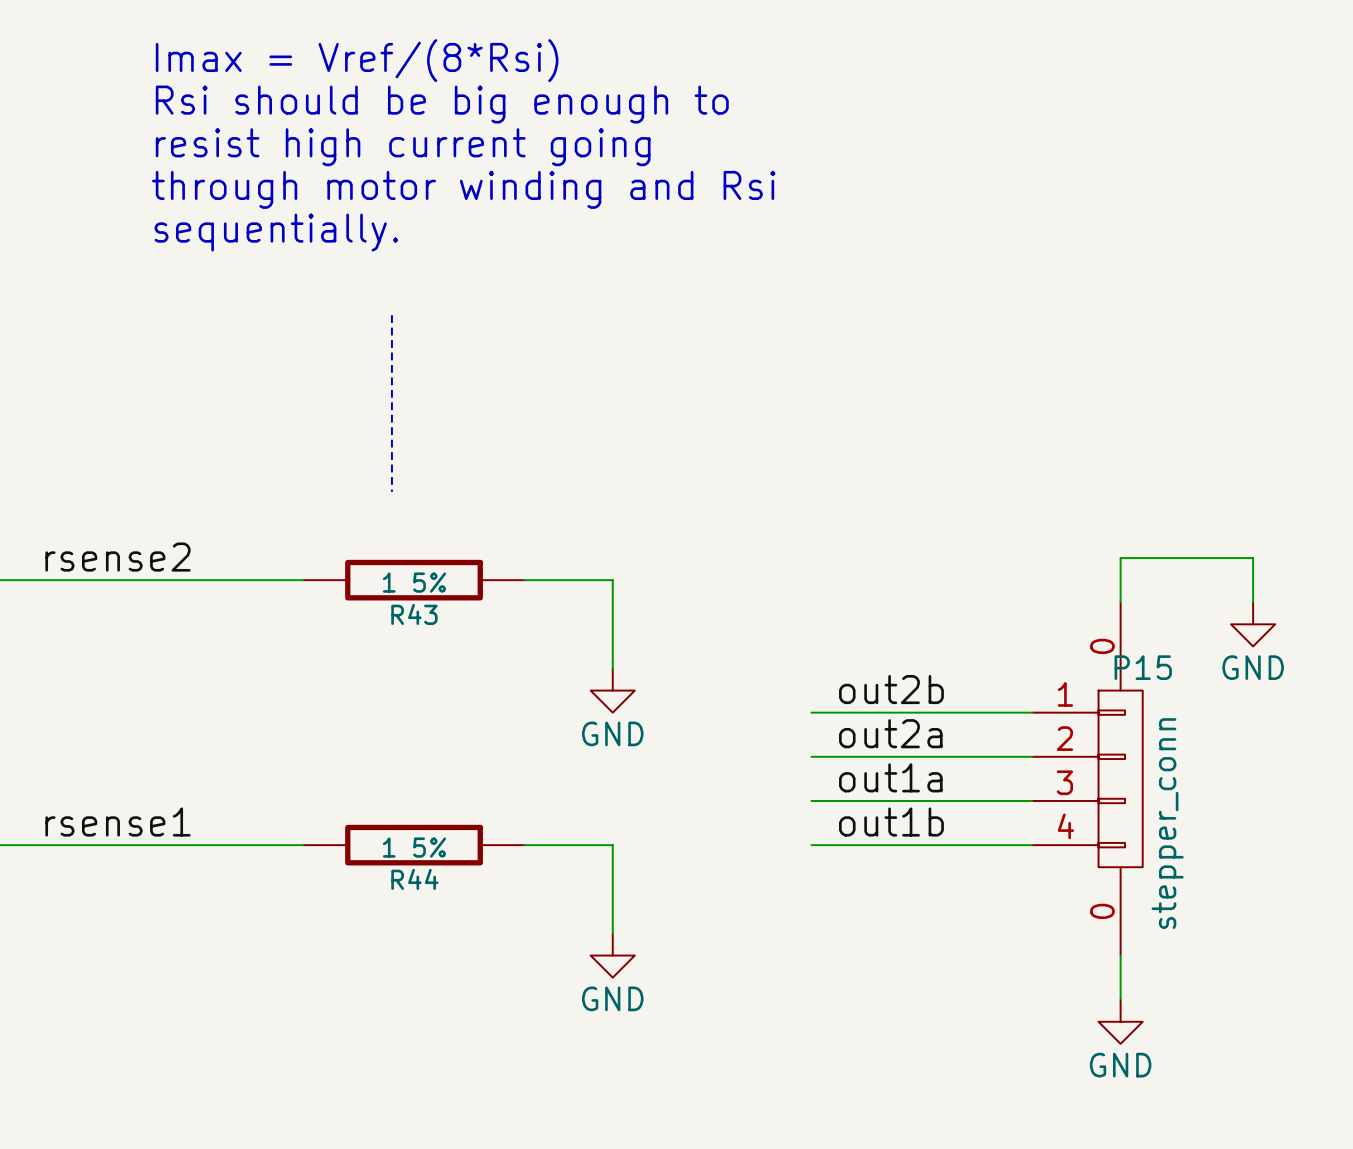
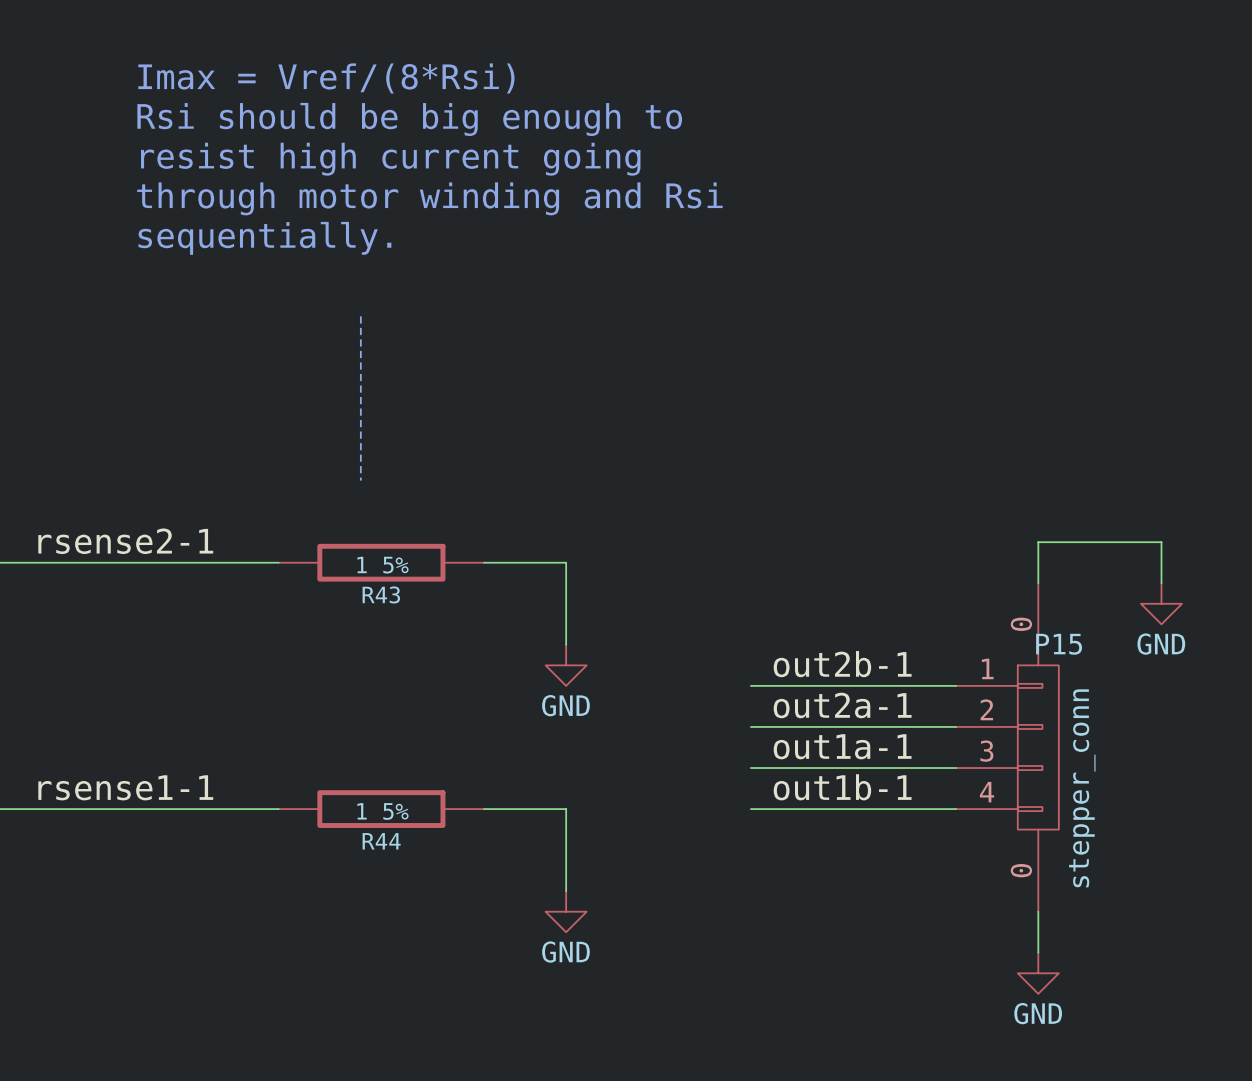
label: rsense2 (117, 557) -> rsense2-1 (125, 541)
label: out2b (891, 689) -> out2b-1 (842, 664)
label: out2a (890, 733) -> out2a-1 (842, 705)
label: out1a (890, 777) -> out1a-1 (842, 746)
label: rsense1 (117, 822) -> rsense1-1 (125, 787)
label: out1b (891, 822) -> out1b-1 (842, 787)

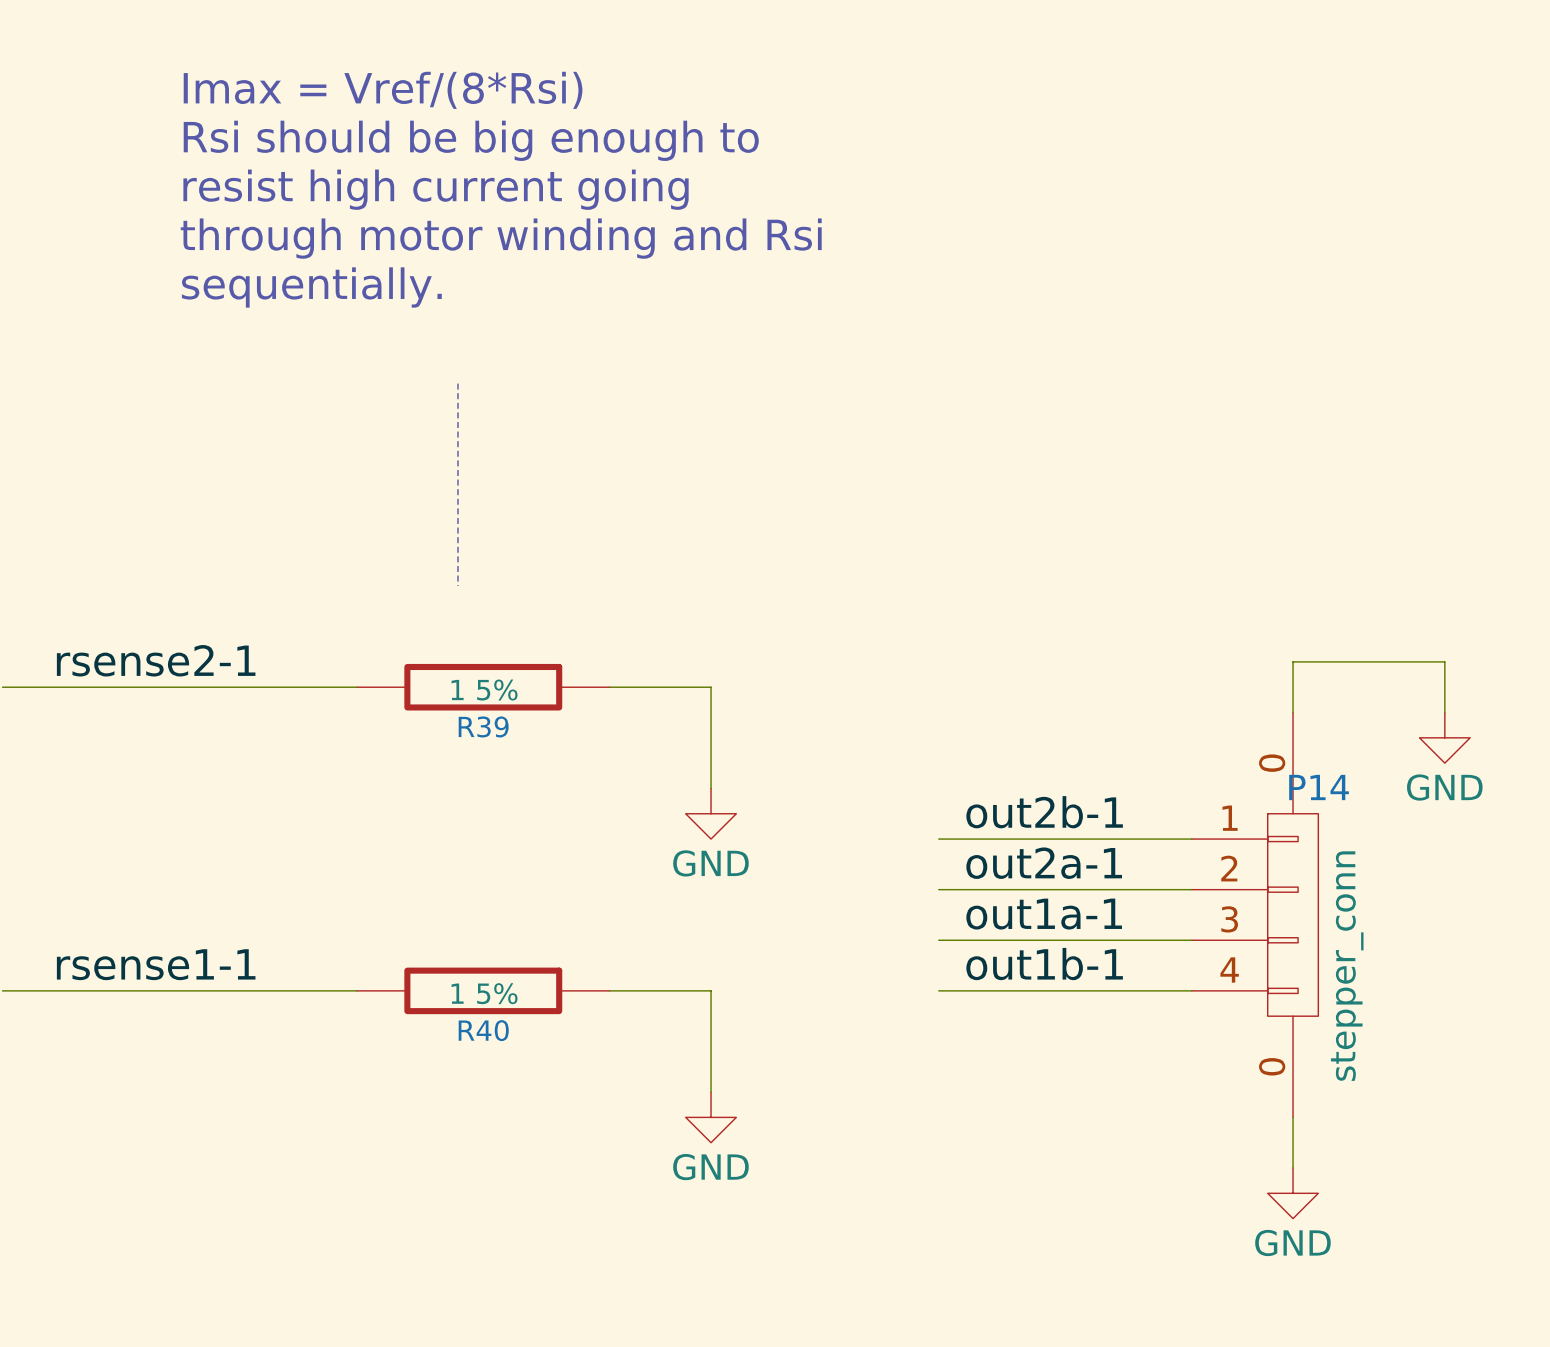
R43 name: R43 (381, 594) -> R39 (483, 726)
P15 name: P15 (1059, 644) -> P14 (1319, 787)
R44 name: R44 (381, 841) -> R40 (483, 1030)

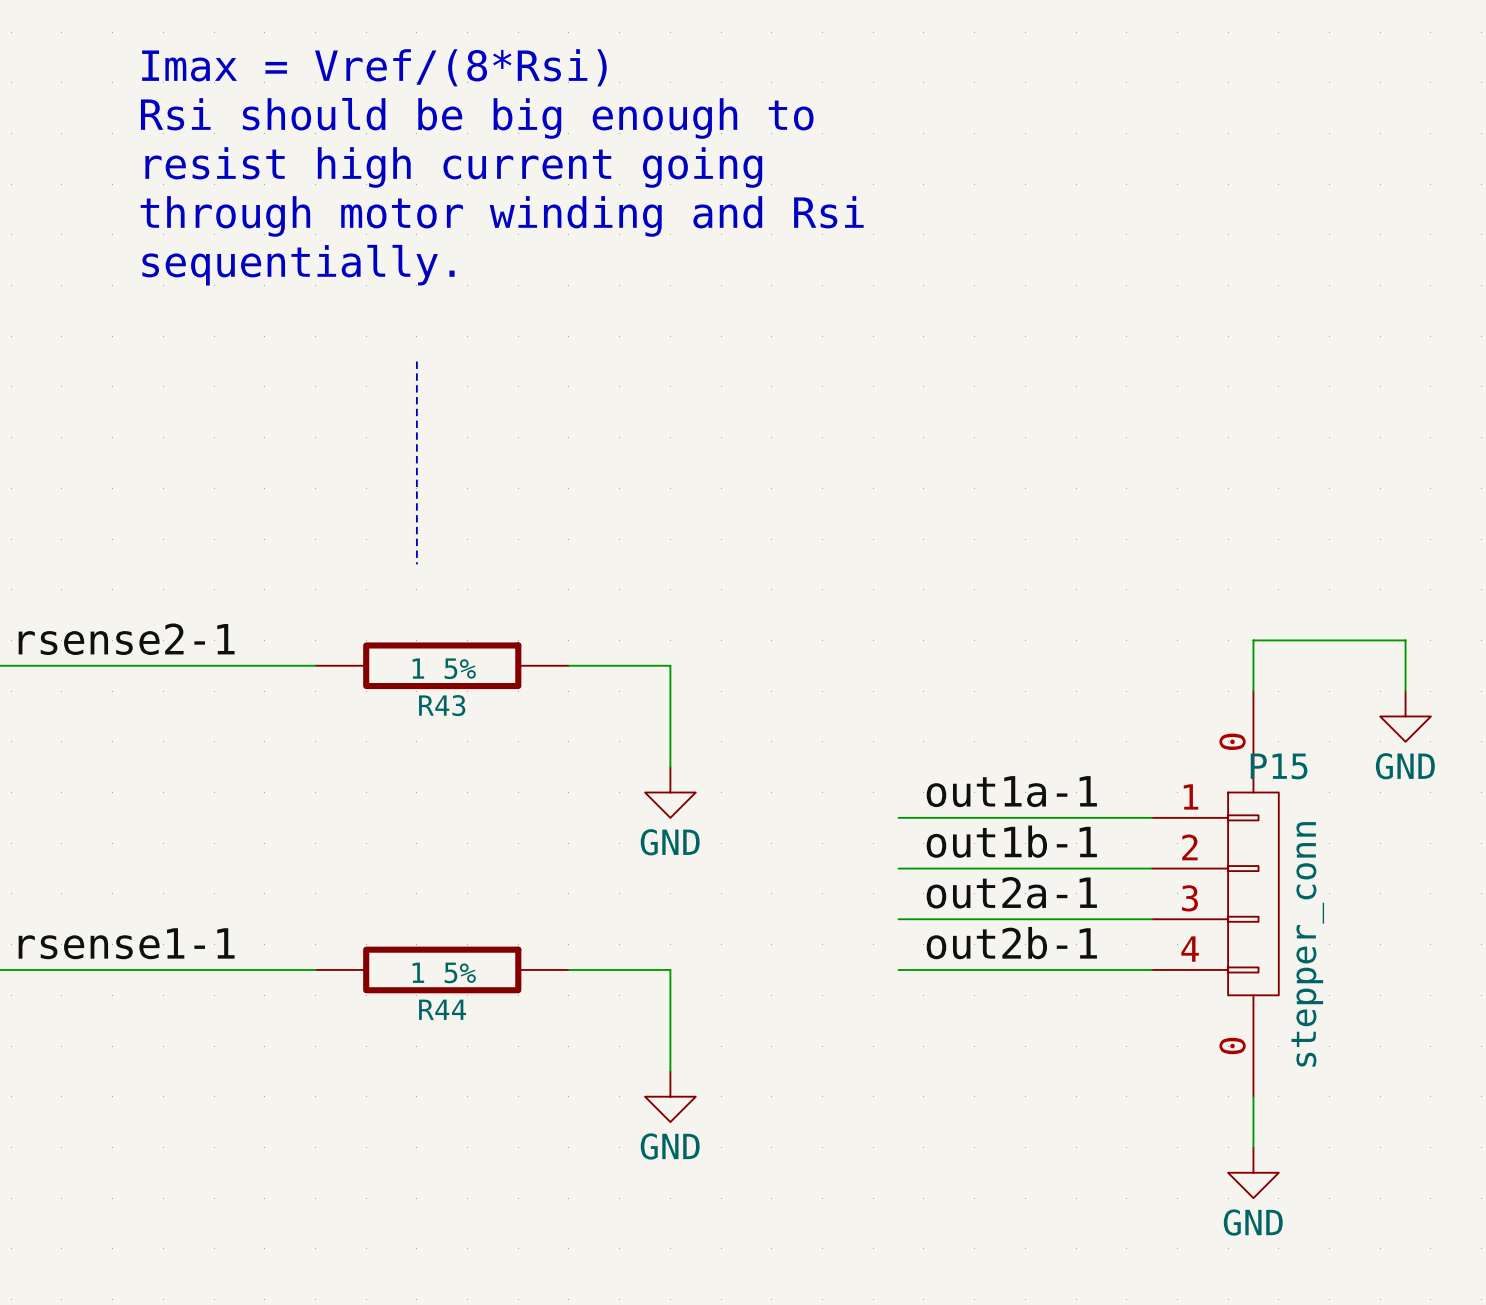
R39 name: R39 (483, 726) -> R43 (442, 705)
P14 name: P14 (1319, 787) -> P15 (1279, 766)
label: out2b-1 (1044, 812) -> out1a-1 (1011, 791)
label: out2a-1 (1044, 863) -> out1b-1 (1011, 841)
label: out1a-1 (1044, 914) -> out2a-1 (1011, 892)
label: out1b-1 (1044, 964) -> out2b-1 (1011, 943)
R40 name: R40 (483, 1030) -> R44 (442, 1009)

